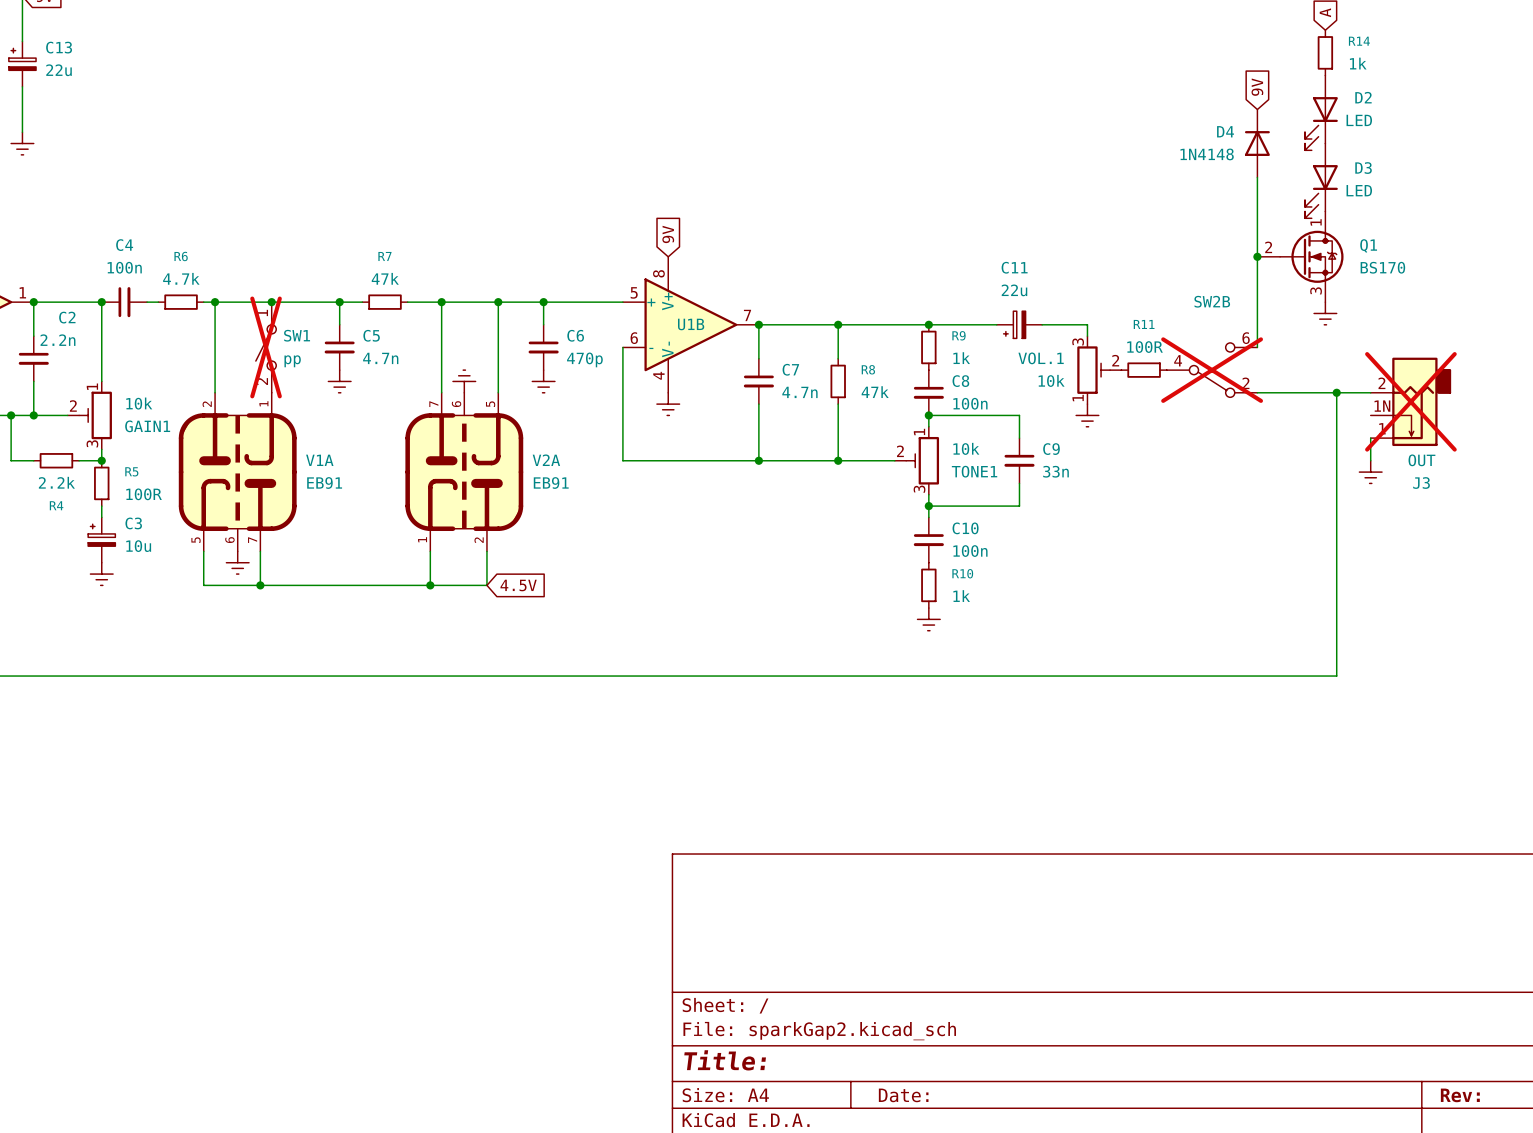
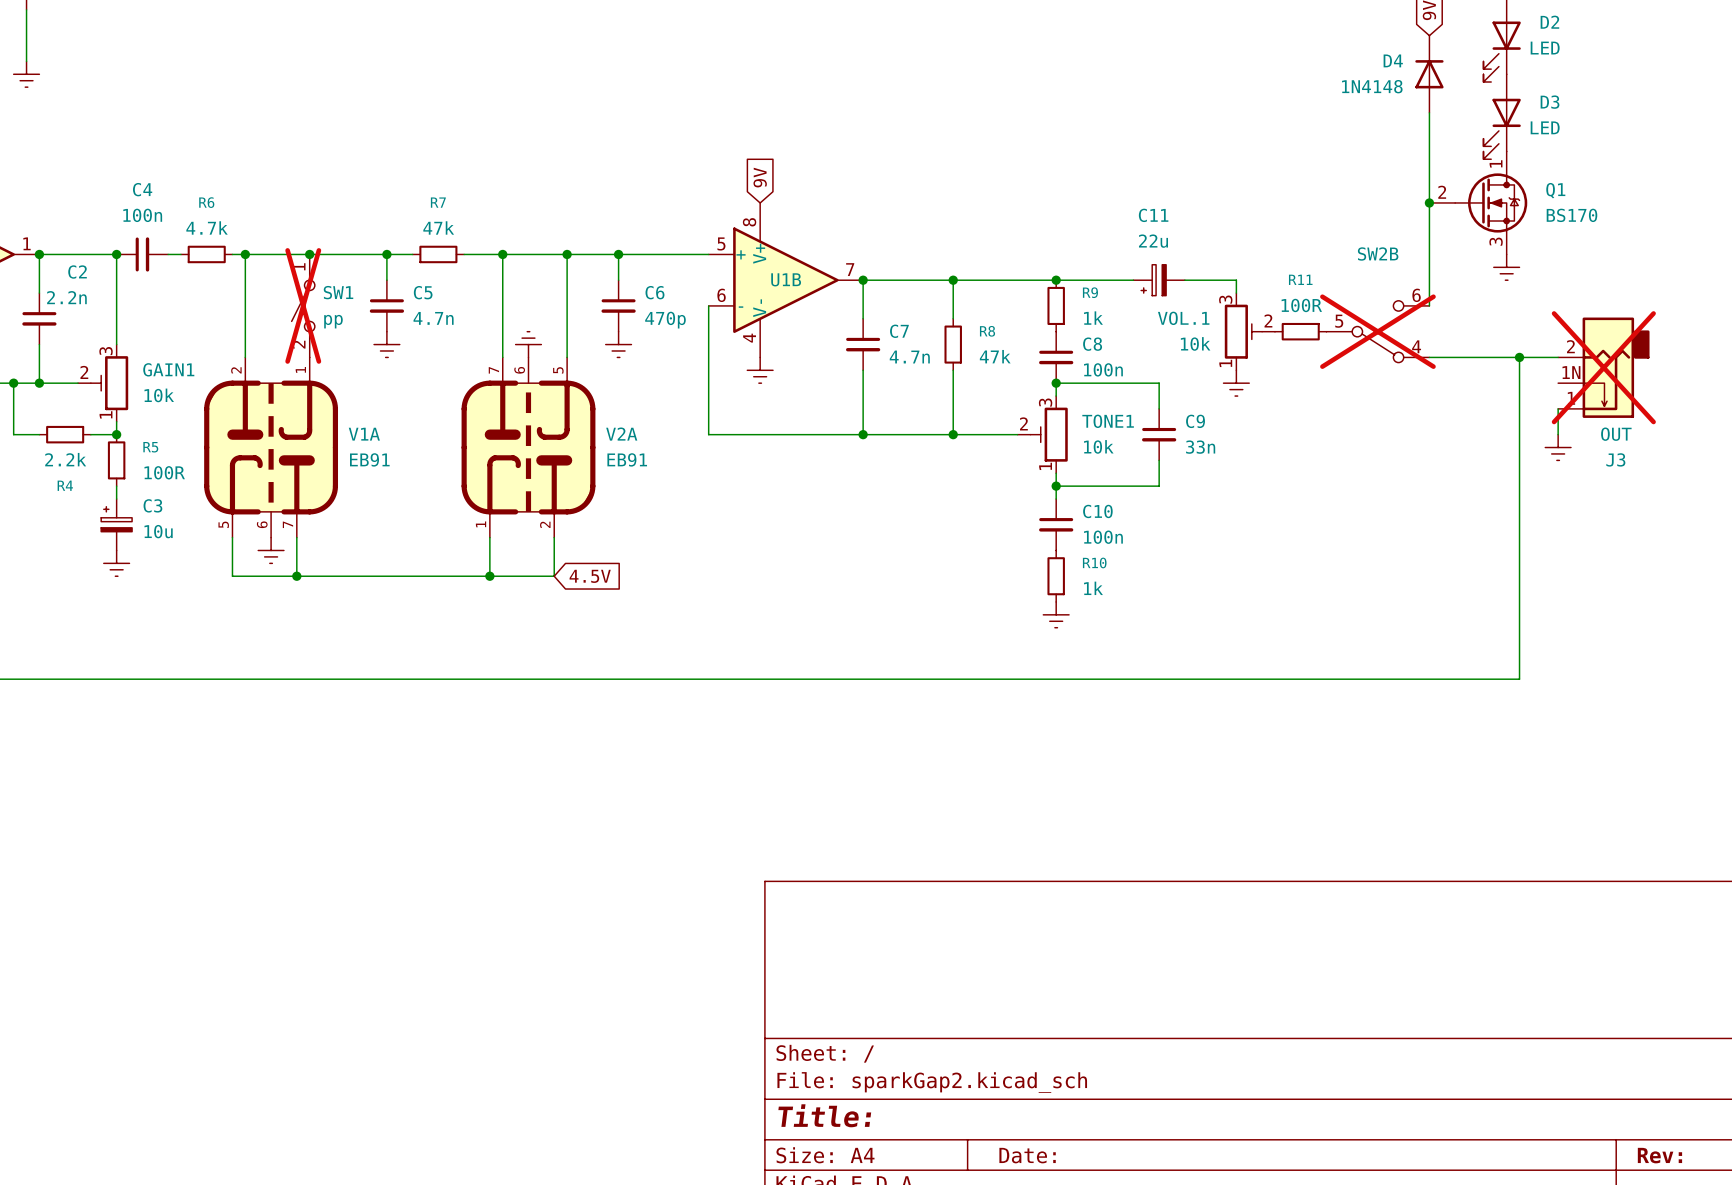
SW2B pin number: 4 (1178, 360) -> 5 (1339, 321)
SW2B pin number: 2 (1245, 383) -> 4 (1416, 346)
GAIN1 flip: as is (95, 415) -> up-down (109, 383)
TONE1 flip: as is (922, 460) -> up-down (1049, 434)

